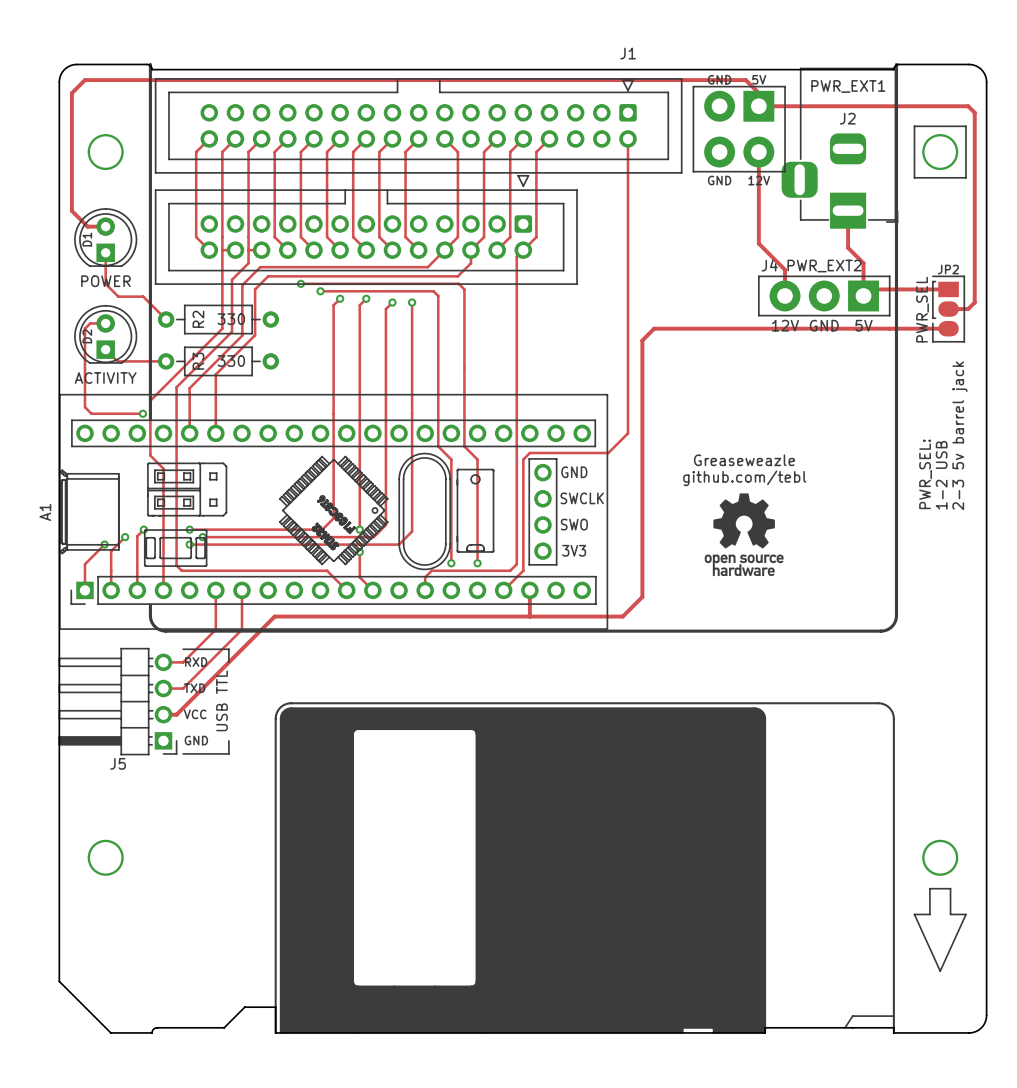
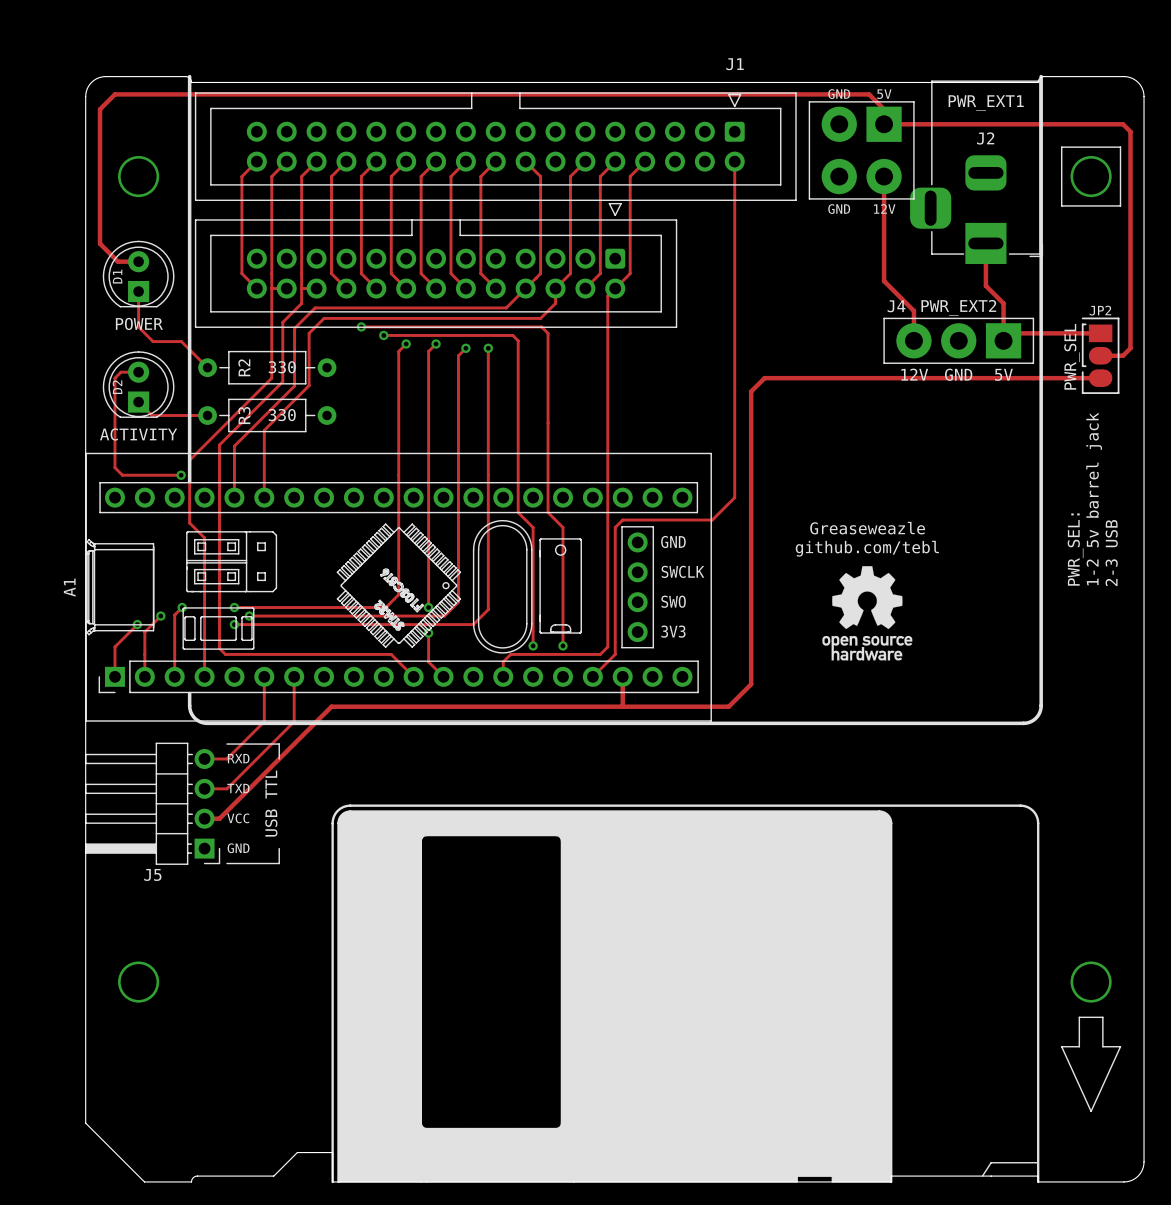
text: 2-3 5v barrel jack (959, 435) -> 2-3 USB (1111, 553)
text: 1-2 USB (941, 475) -> 1-2 5v barrel jack (1094, 498)

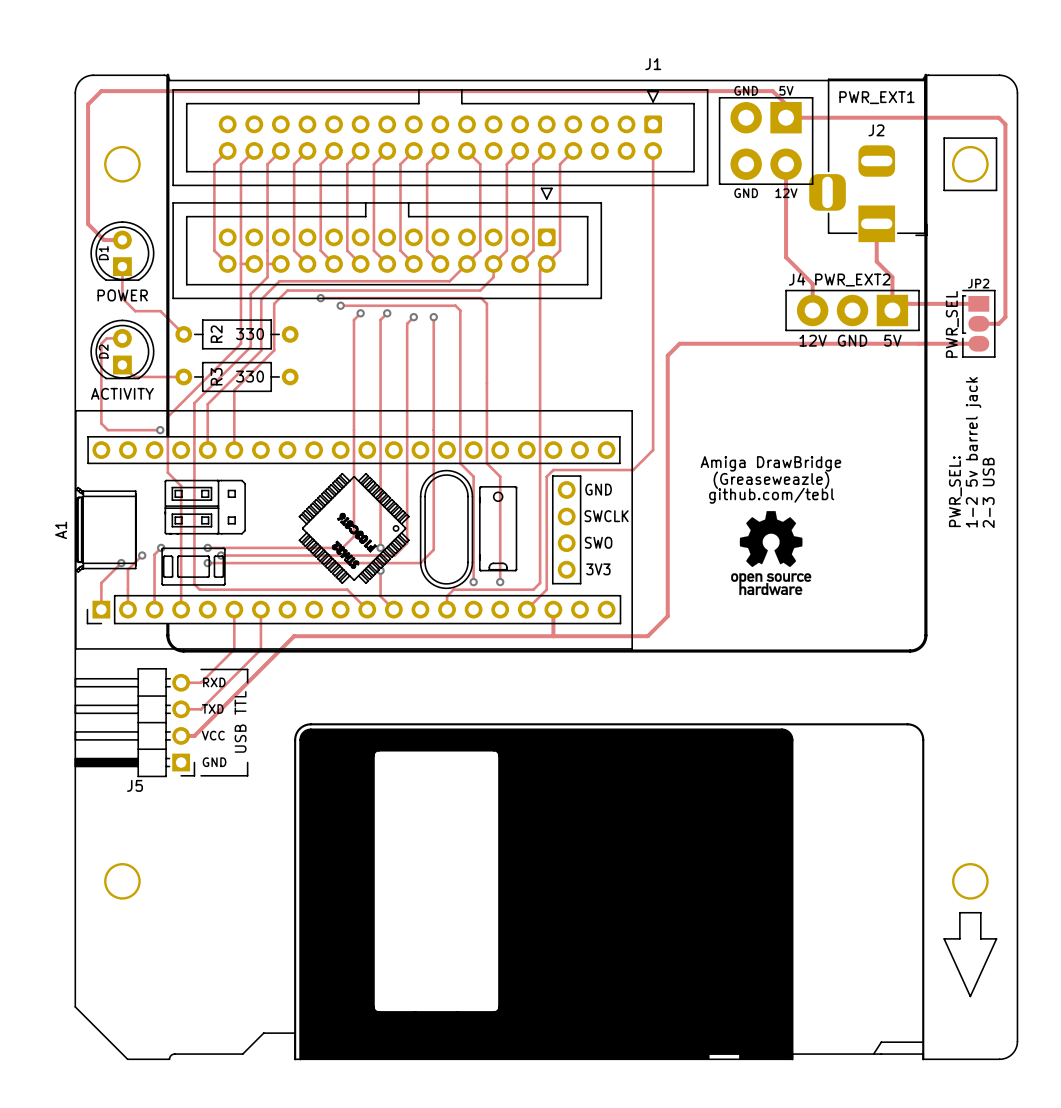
text: none -> Amiga DrawBridge (770, 463)
text: Greaseweazle (867, 528) -> (Greaseweazle) (771, 480)

